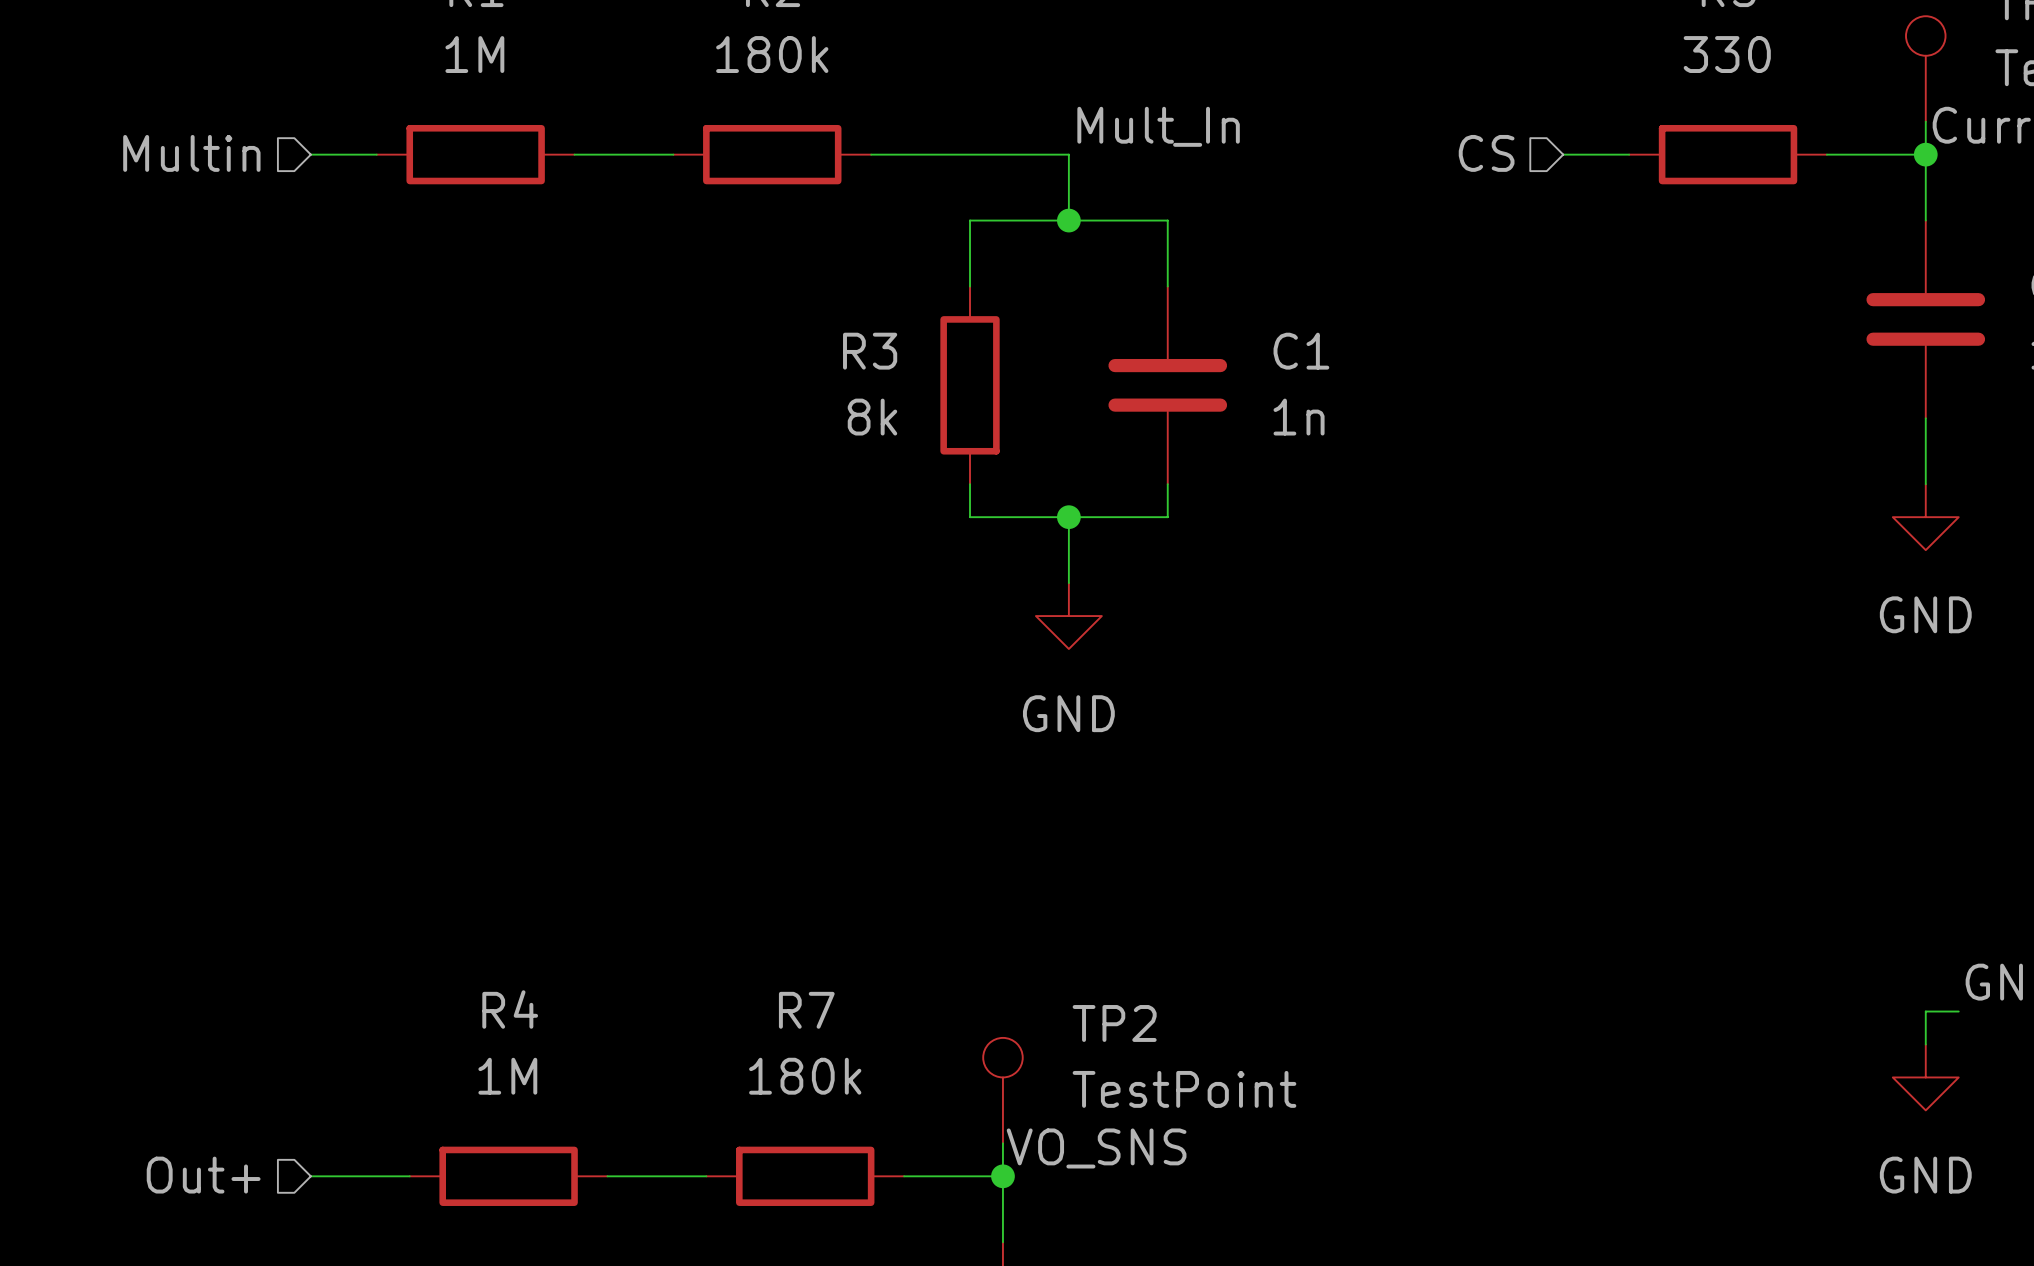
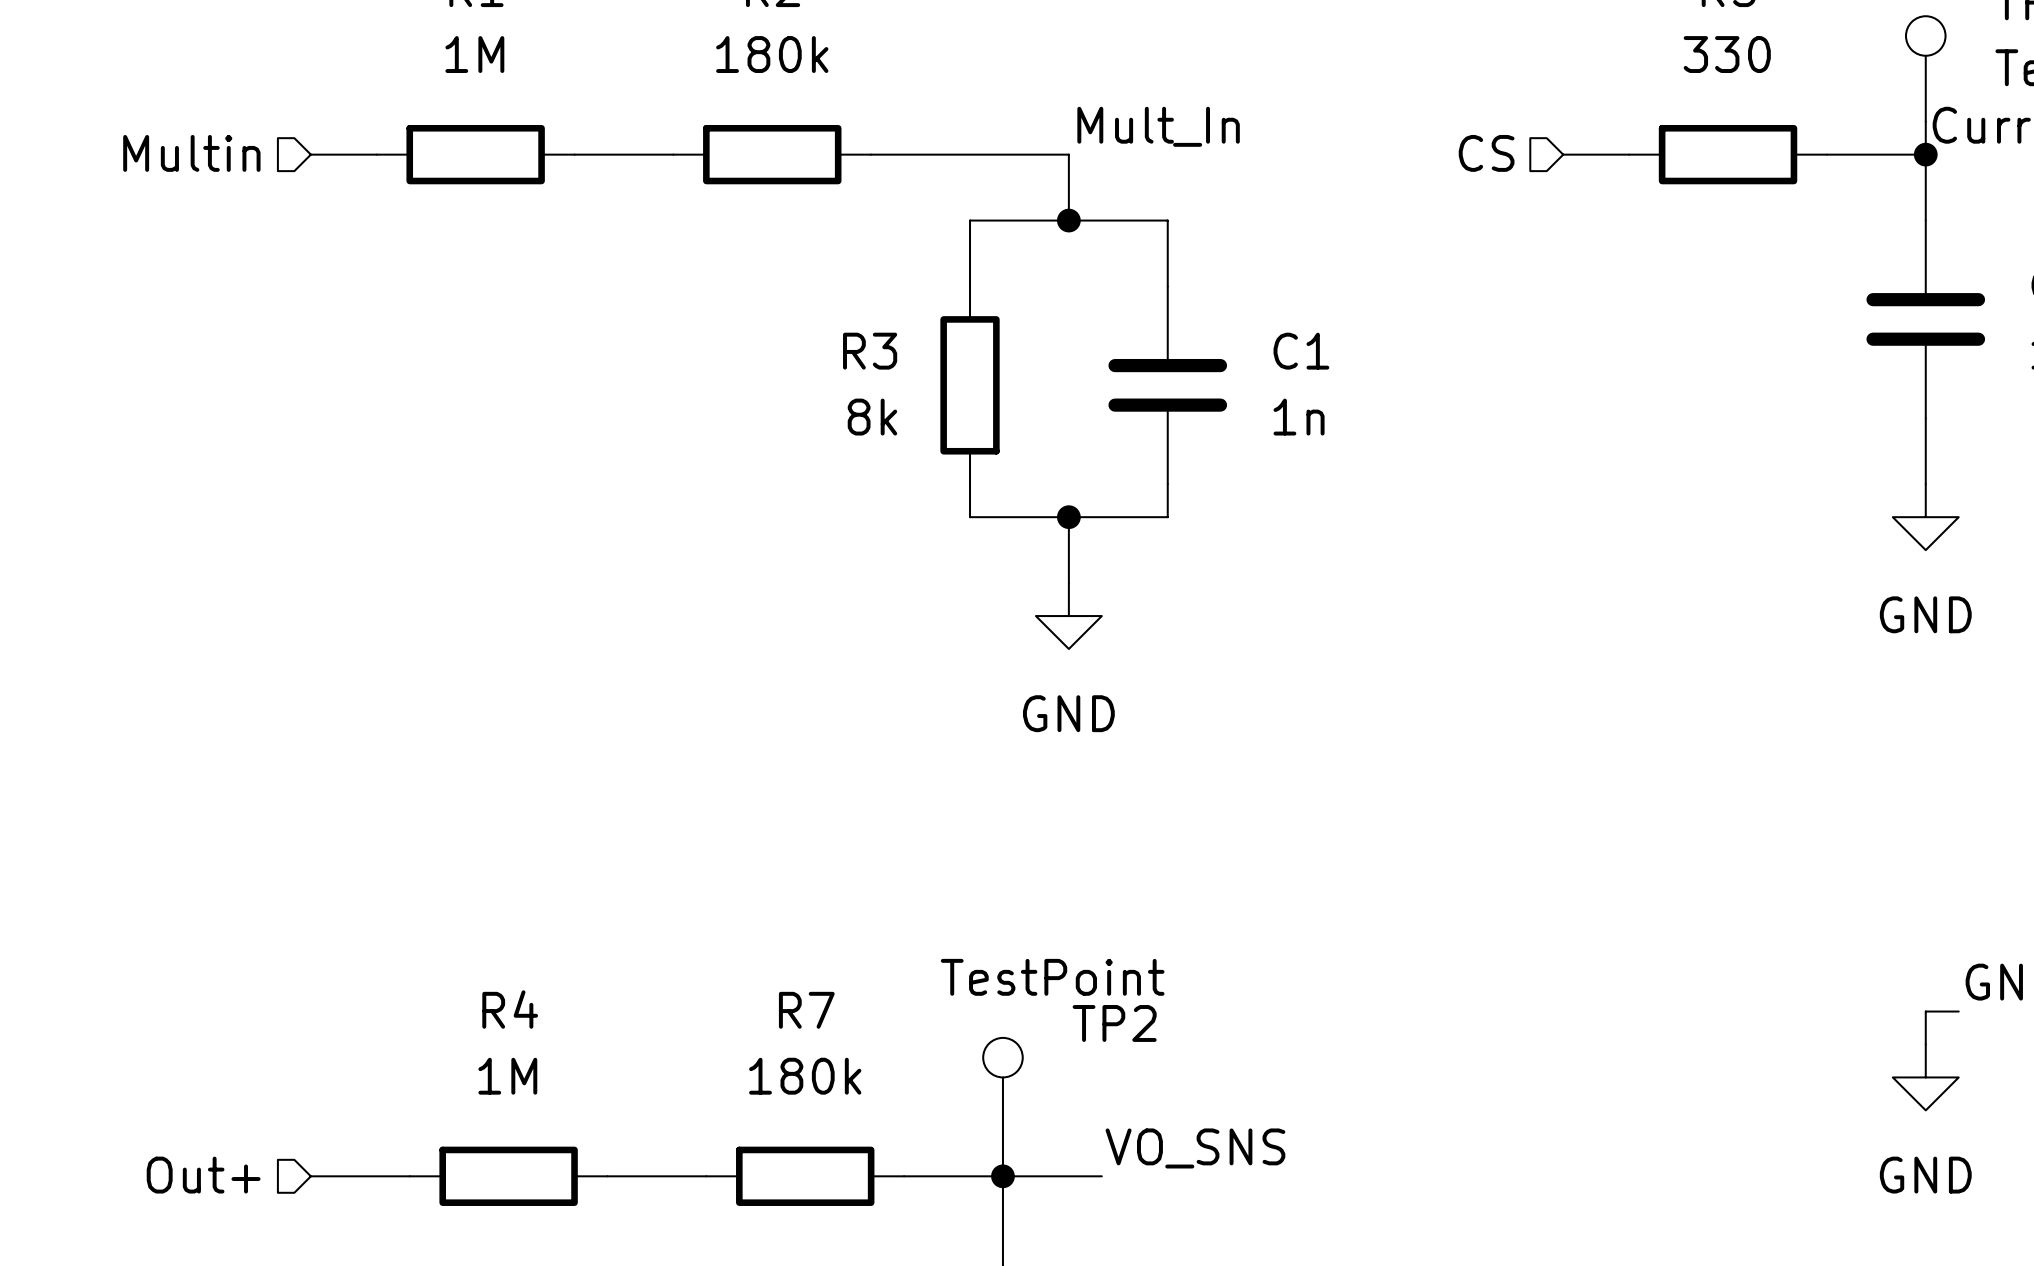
TP2 value position: TestPoint (1184, 1089) -> TestPoint (1052, 977)
label position: VO_SNS (1096, 1148) -> VO_SNS (1195, 1148)
wire: none -> (1002, 1176) (1101, 1176)

